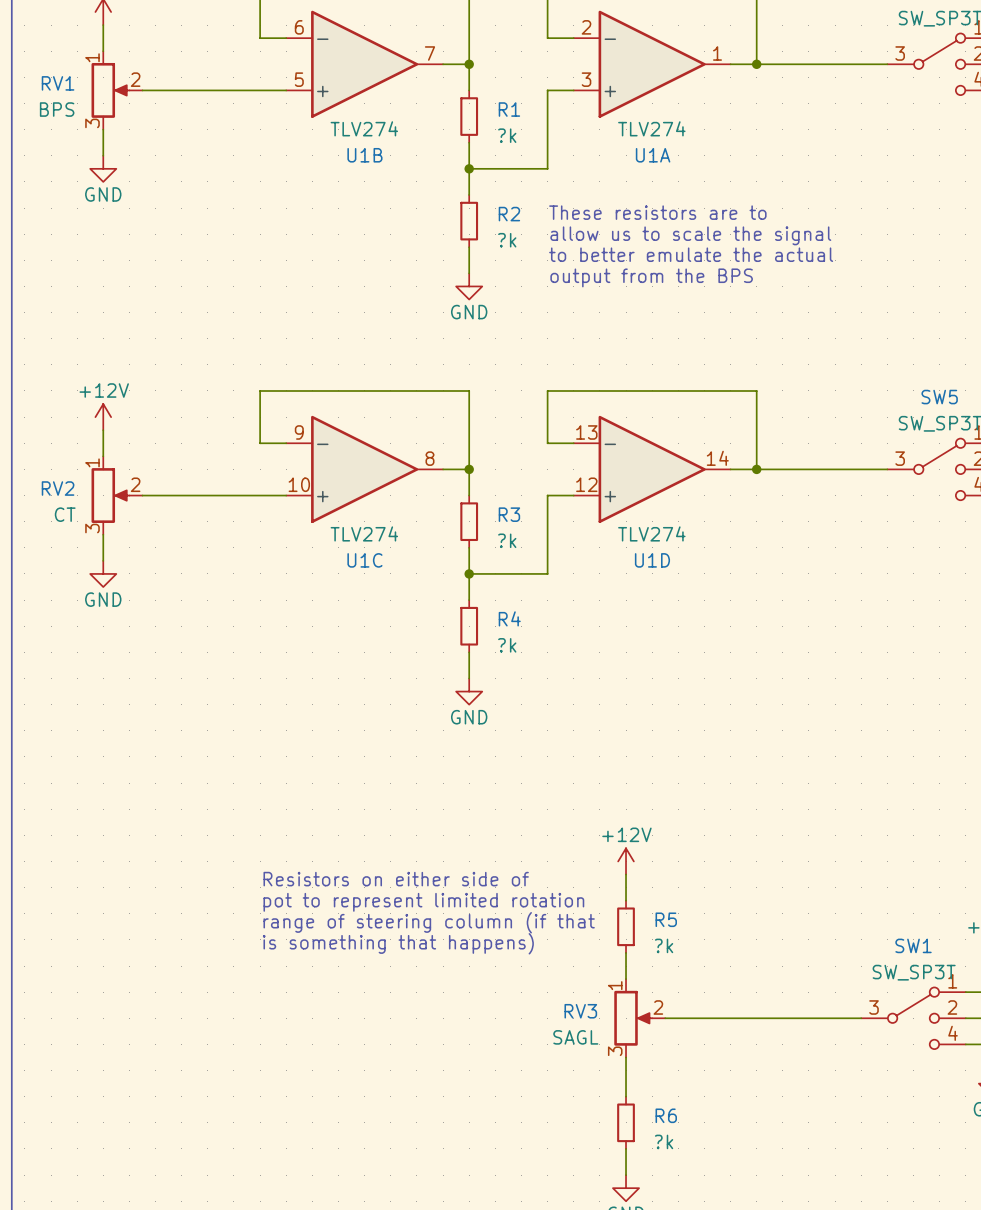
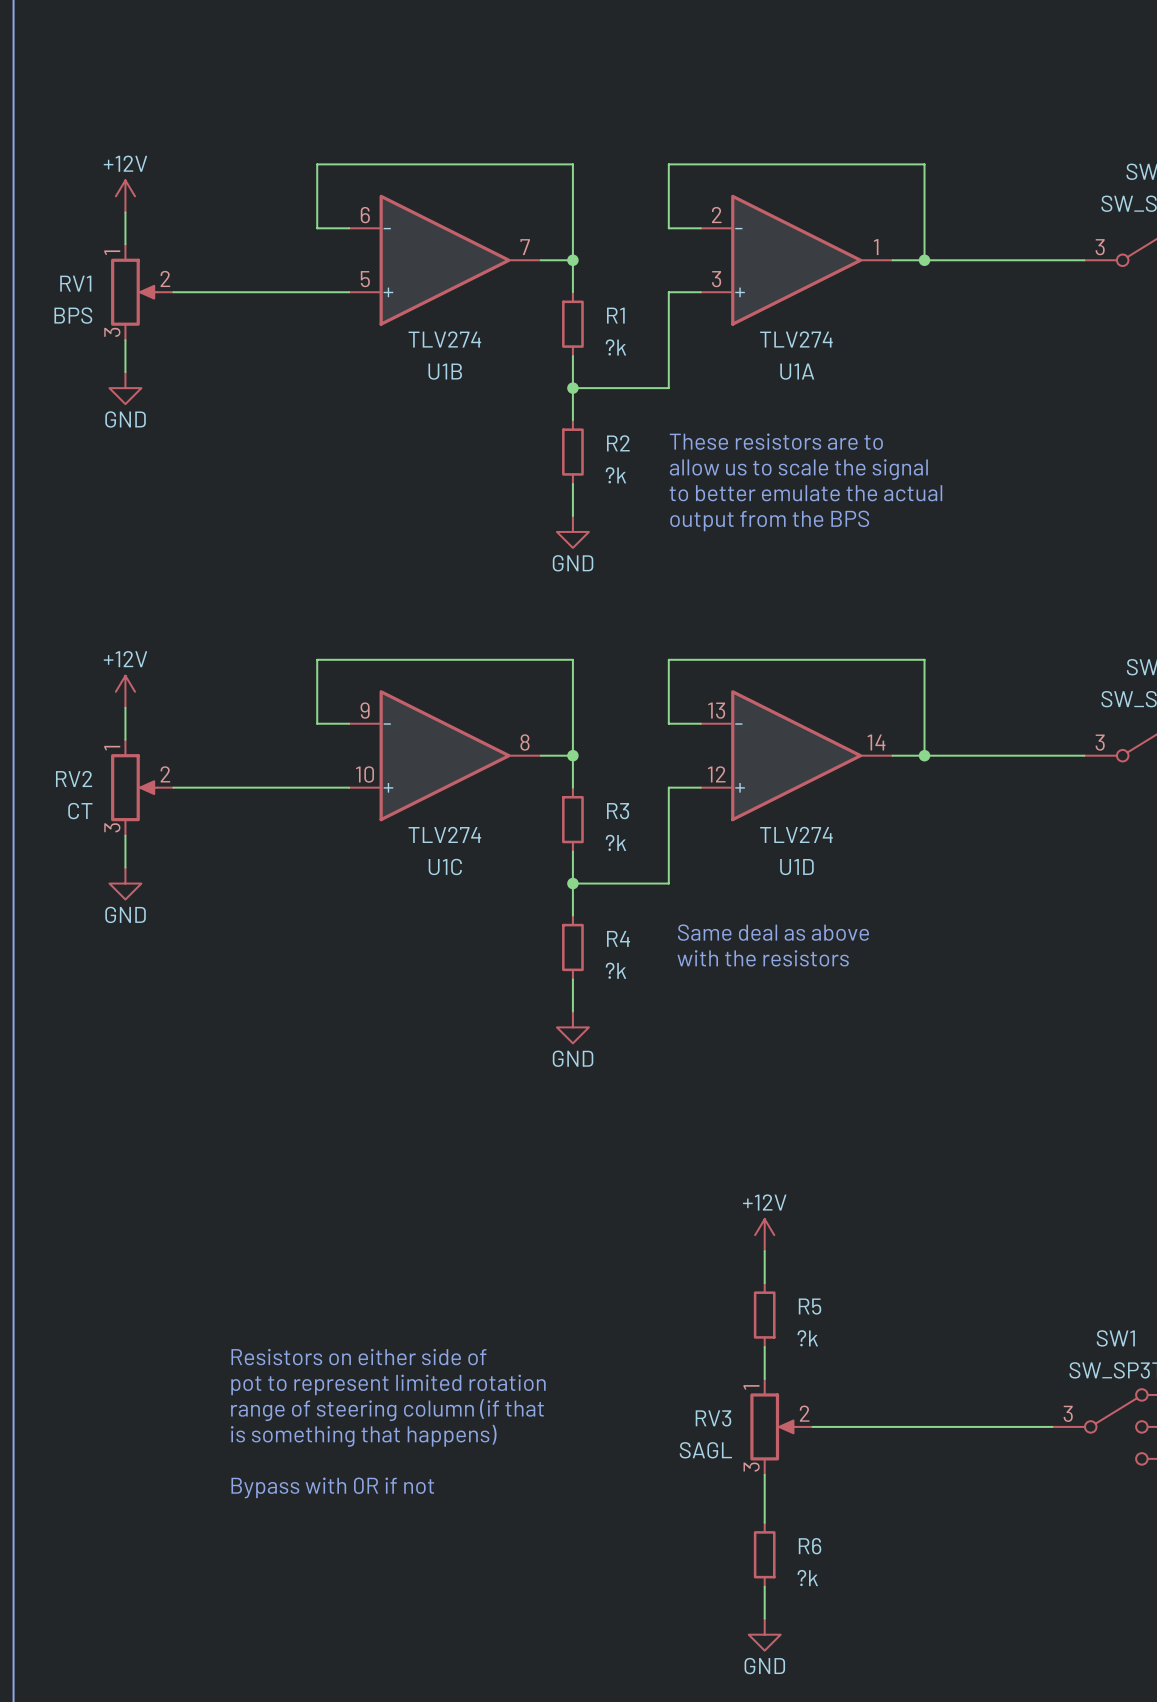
text: none -> Same deal as above (773, 932)
text: none -> with the resistors (763, 958)
text position: Resistors on either side of (396, 879) -> Resistors on either side of (358, 1357)
text position: pot to represent limited rotation (423, 902) -> pot to represent limited rotation (388, 1384)
text position: range of steering column (if that (429, 922) -> range of steering column (if that (387, 1410)
text position: is something that happens) (398, 943) -> is something that happens) (363, 1435)
text: none -> Bypass with 0R if not (332, 1487)

